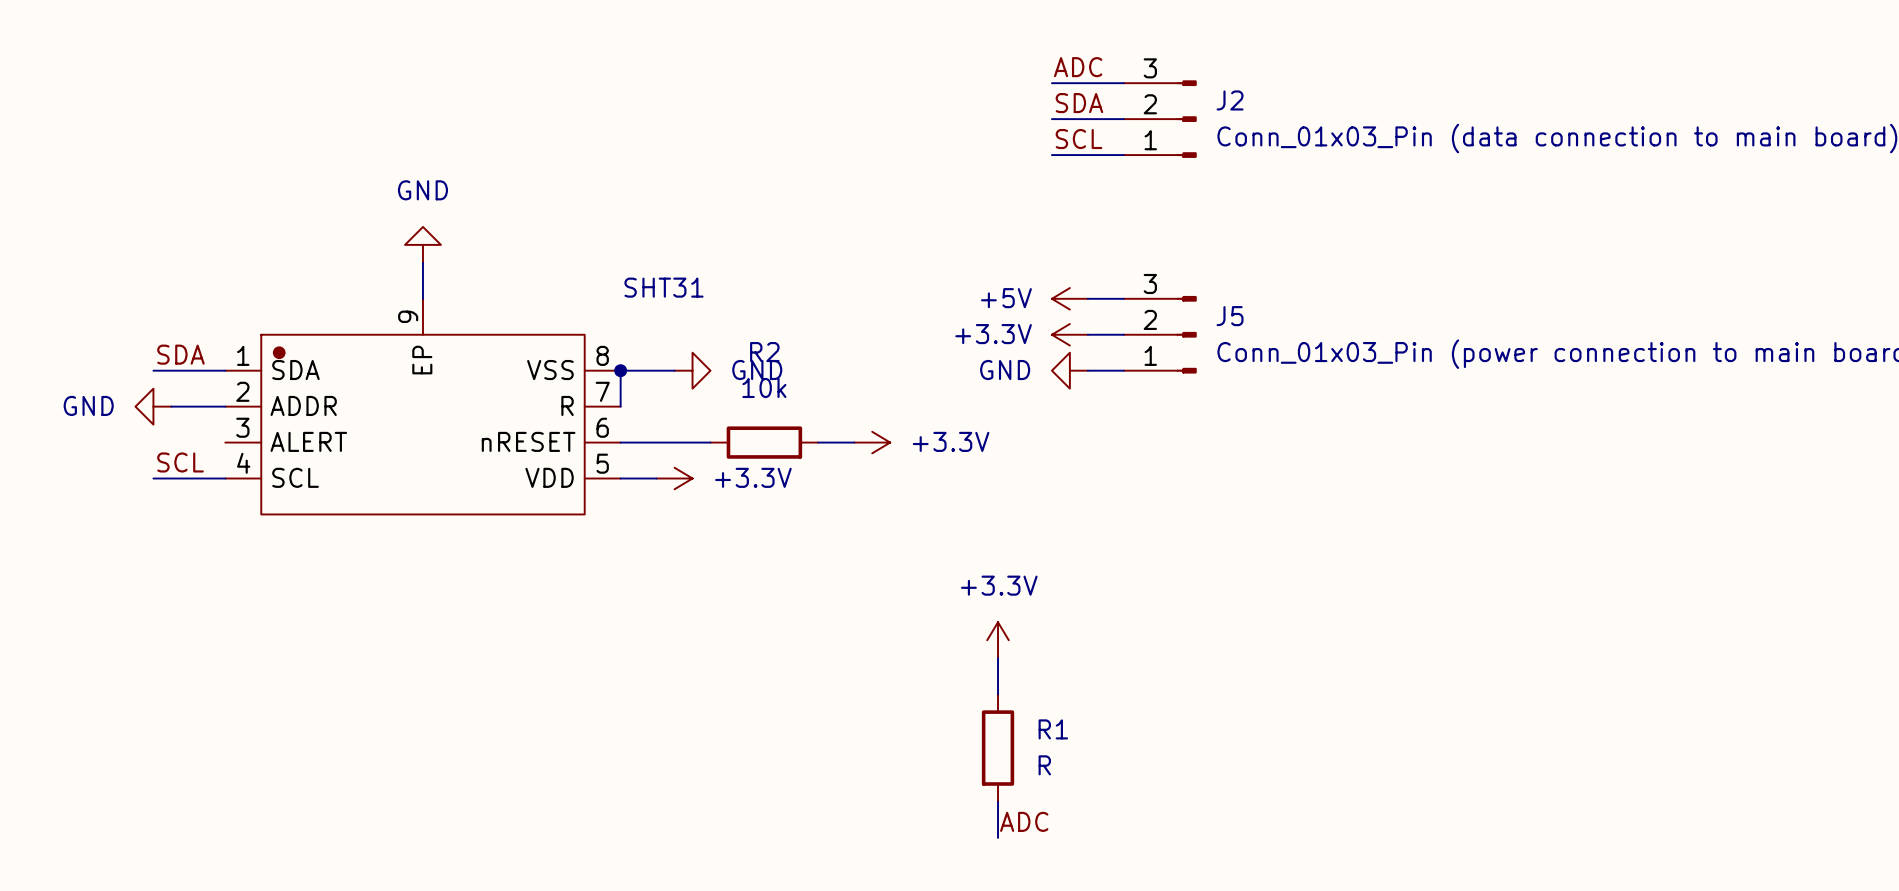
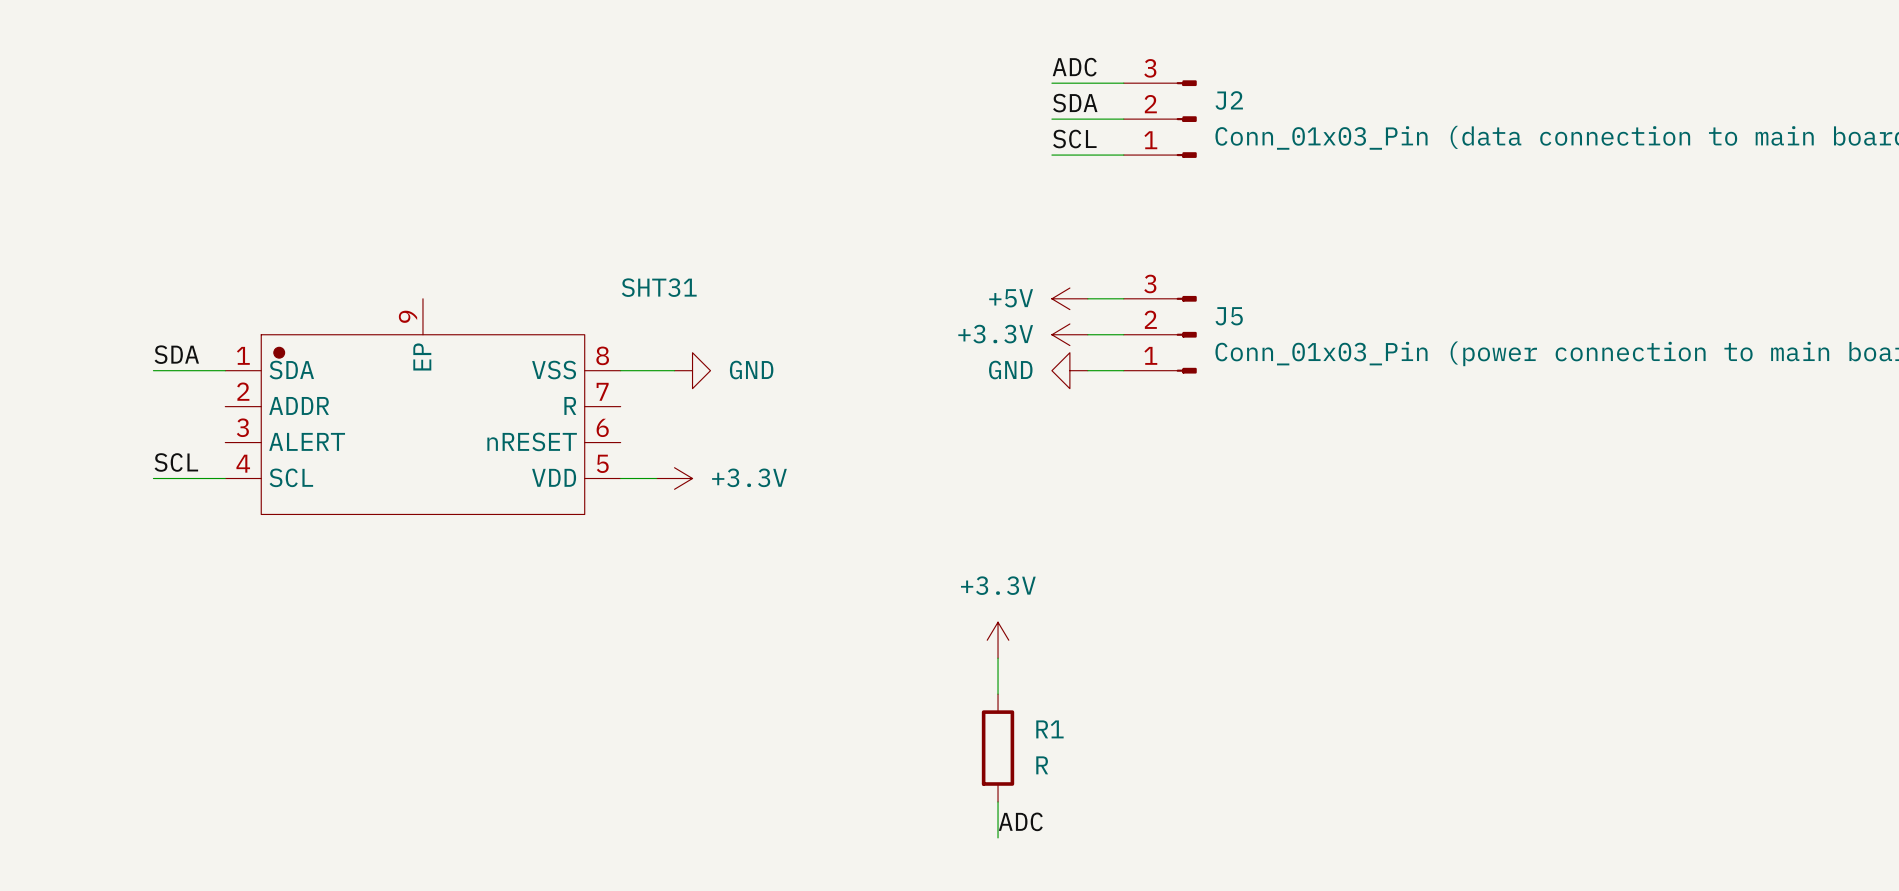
power symbol: GND (422, 244) -> none
wire: (422, 262) (422, 298) -> none
wire: (620, 370) (620, 406) -> none
junction: (620, 370) -> none
power symbol: GND (153, 406) -> none
wire: (171, 406) (225, 406) -> none
wire: (620, 442) (710, 442) -> none
R2: 10k (764, 442) -> none
wire: (818, 442) (854, 442) -> none
power symbol: +3.3V (872, 442) -> none

